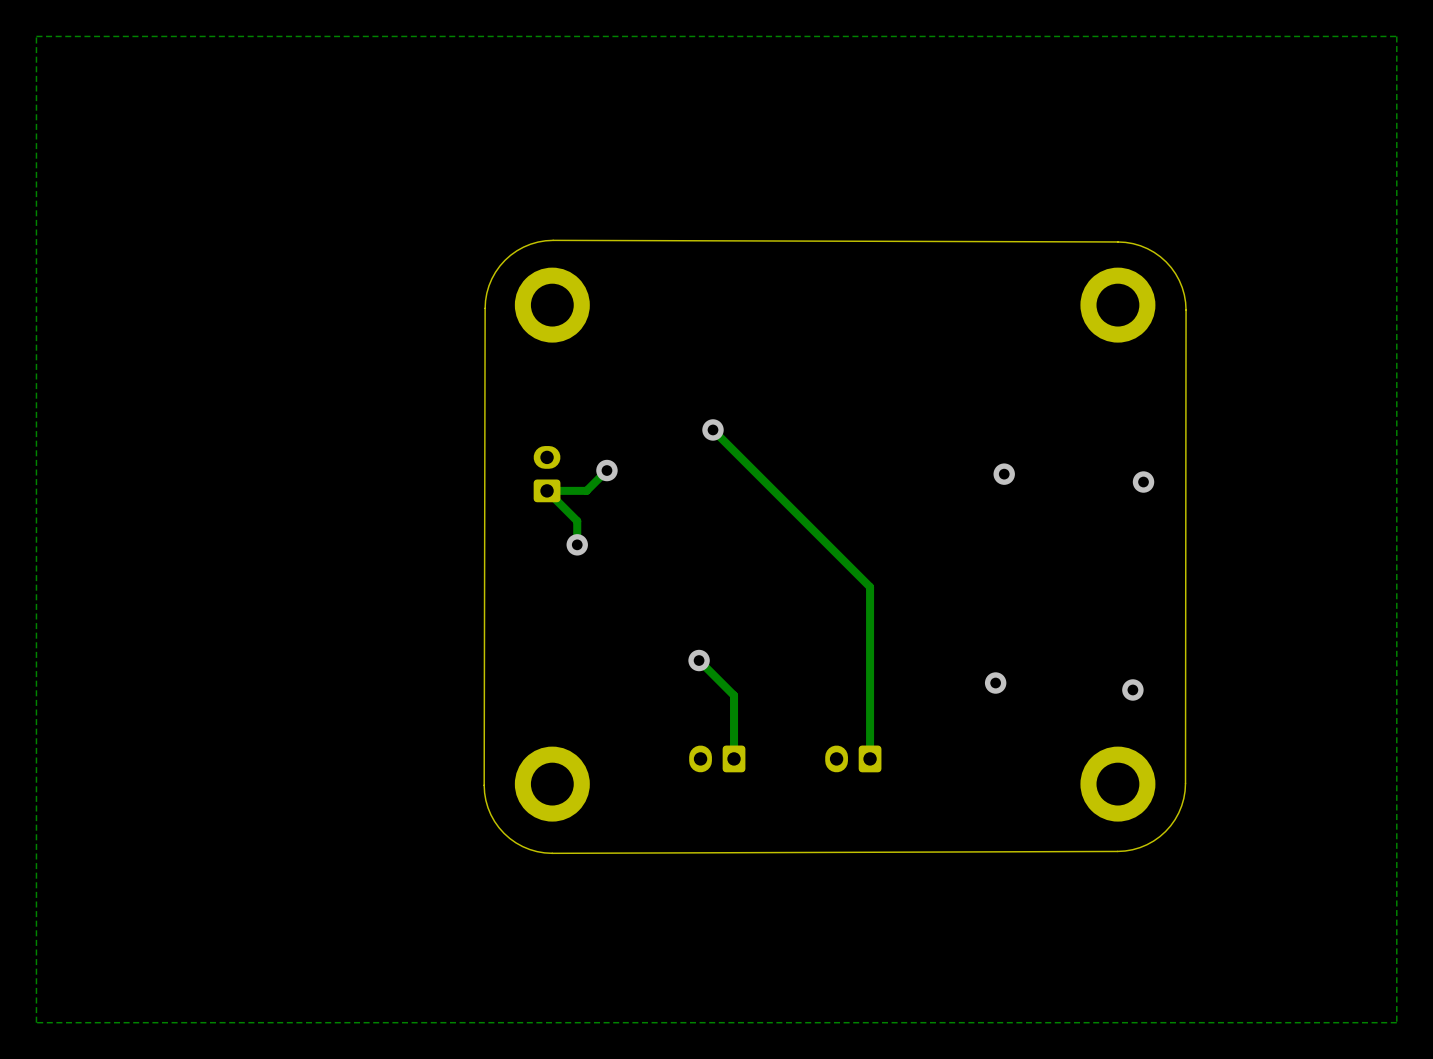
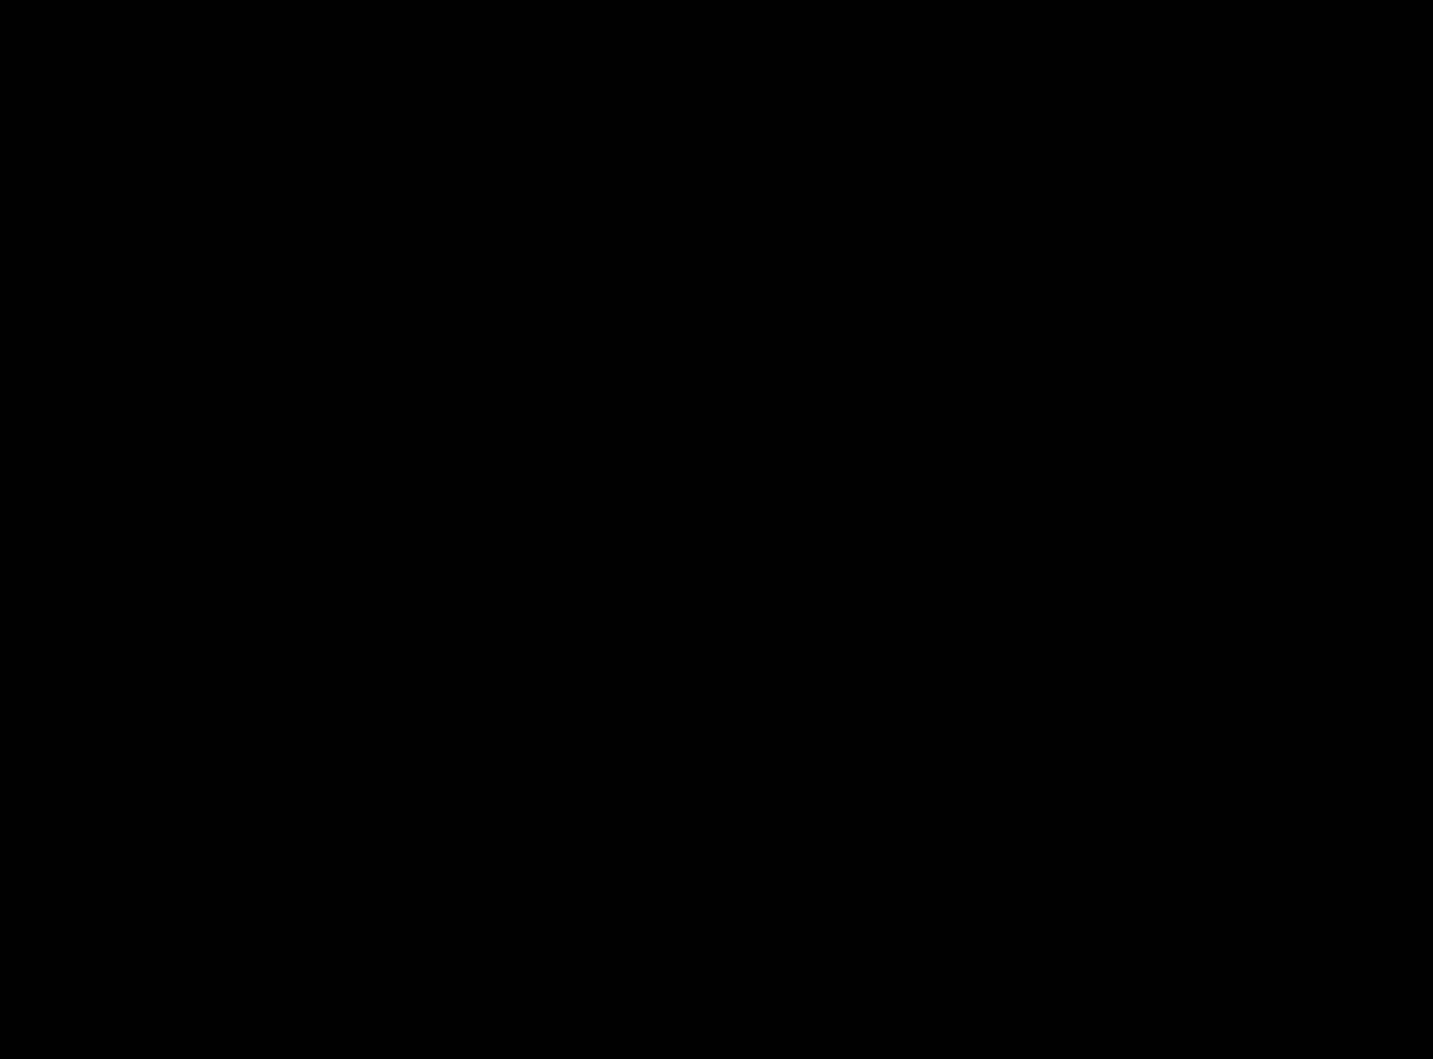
zone outline: (1396, 36) (1396, 1022) (36, 1022) (36, 36) (1396, 36) -> none
board edge: (553, 240) (1118, 241) (1133, 243) (1147, 248) (1166, 261) (1175, 273) (1182, 287) (1186, 309) (1185, 783) (1181, 805) (1175, 819) (1165, 831) (1147, 844) (1132, 849) (1117, 851) (552, 853) (537, 851) (522, 846) (504, 833) (490, 814) (485, 800) (484, 785) (485, 300) (488, 285) (495, 272) (510, 255) (530, 244) (553, 240) -> none
part: (552, 305) -> none
part: (1117, 305) -> none
track: (713, 429) (870, 587) (870, 758) -> none
via: (713, 429) -> none
track: (606, 470) (586, 490) (547, 490) (577, 521) (577, 544) -> none
via: (606, 470) -> none
part: (547, 474) -> none
via: (1004, 474) -> none
via: (1143, 482) -> none
via: (577, 544) -> none
track: (699, 660) (734, 695) (734, 758) -> none
via: (699, 660) -> none
via: (995, 683) -> none
via: (1132, 689) -> none
part: (717, 758) -> none
part: (853, 758) -> none
part: (552, 784) -> none
part: (1117, 784) -> none

